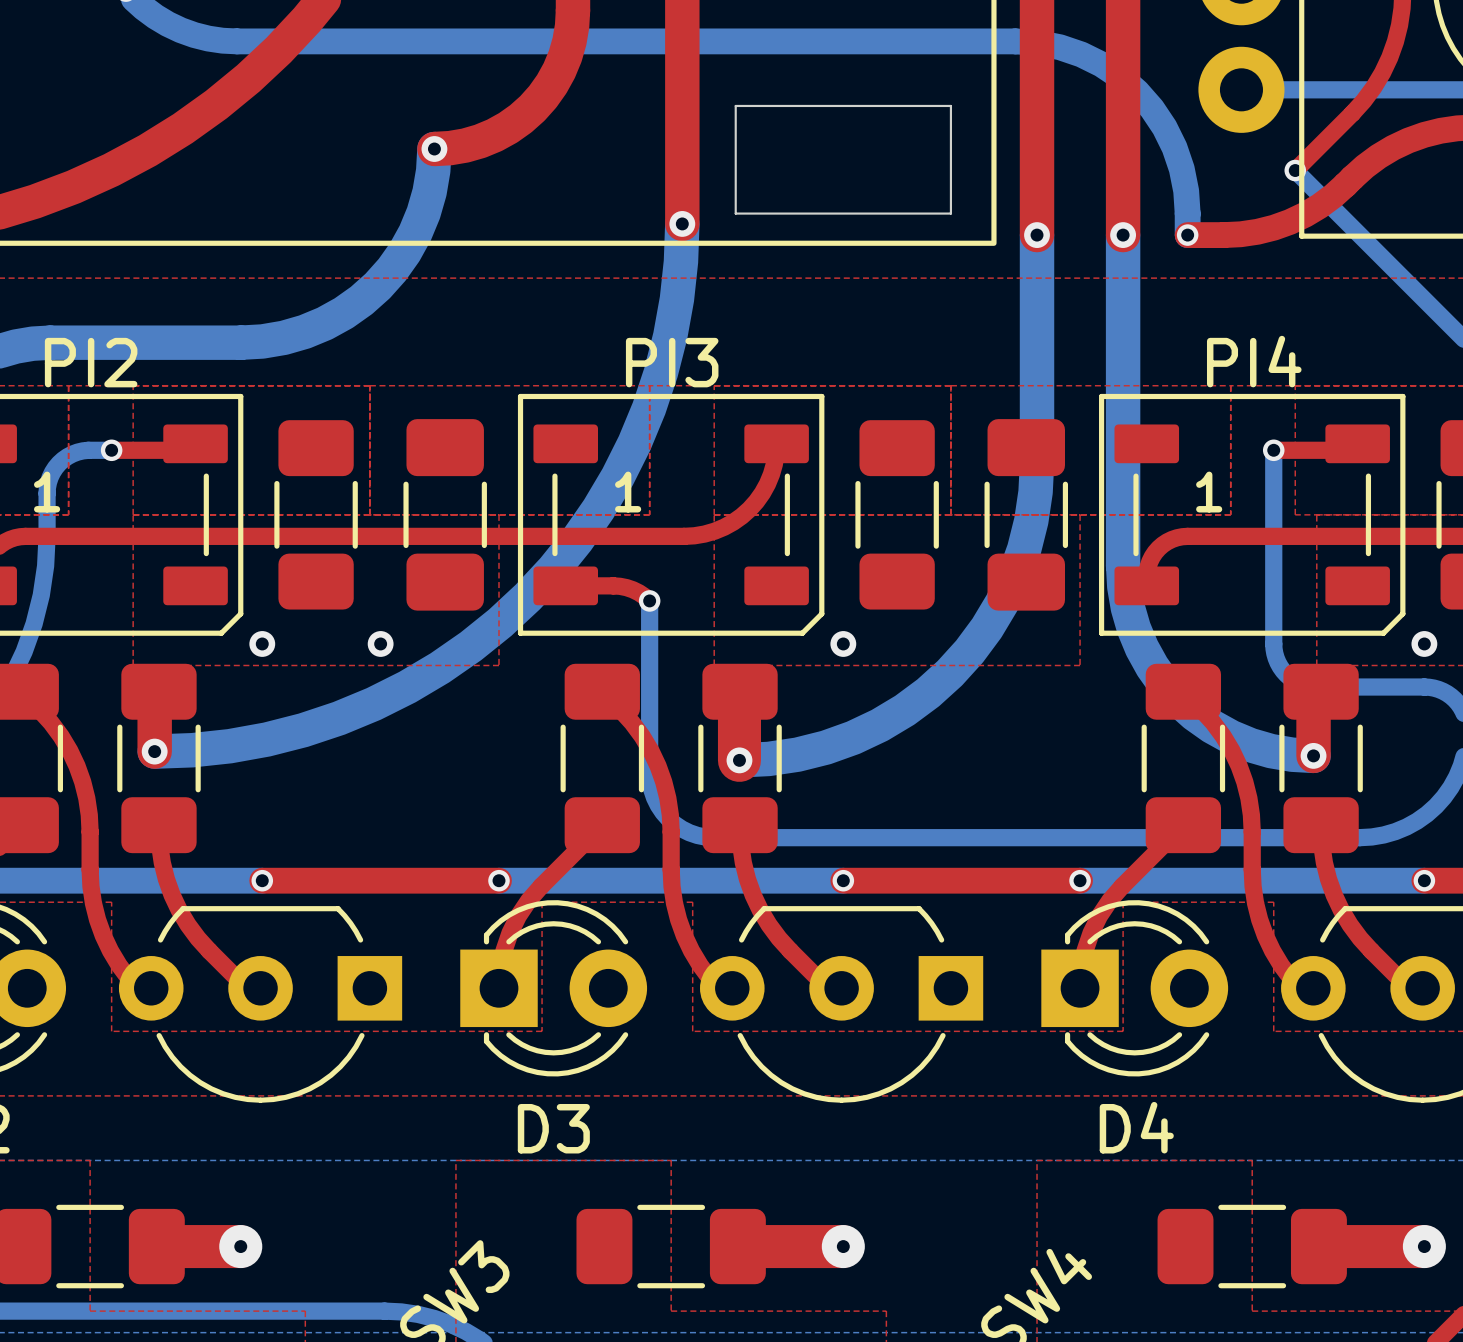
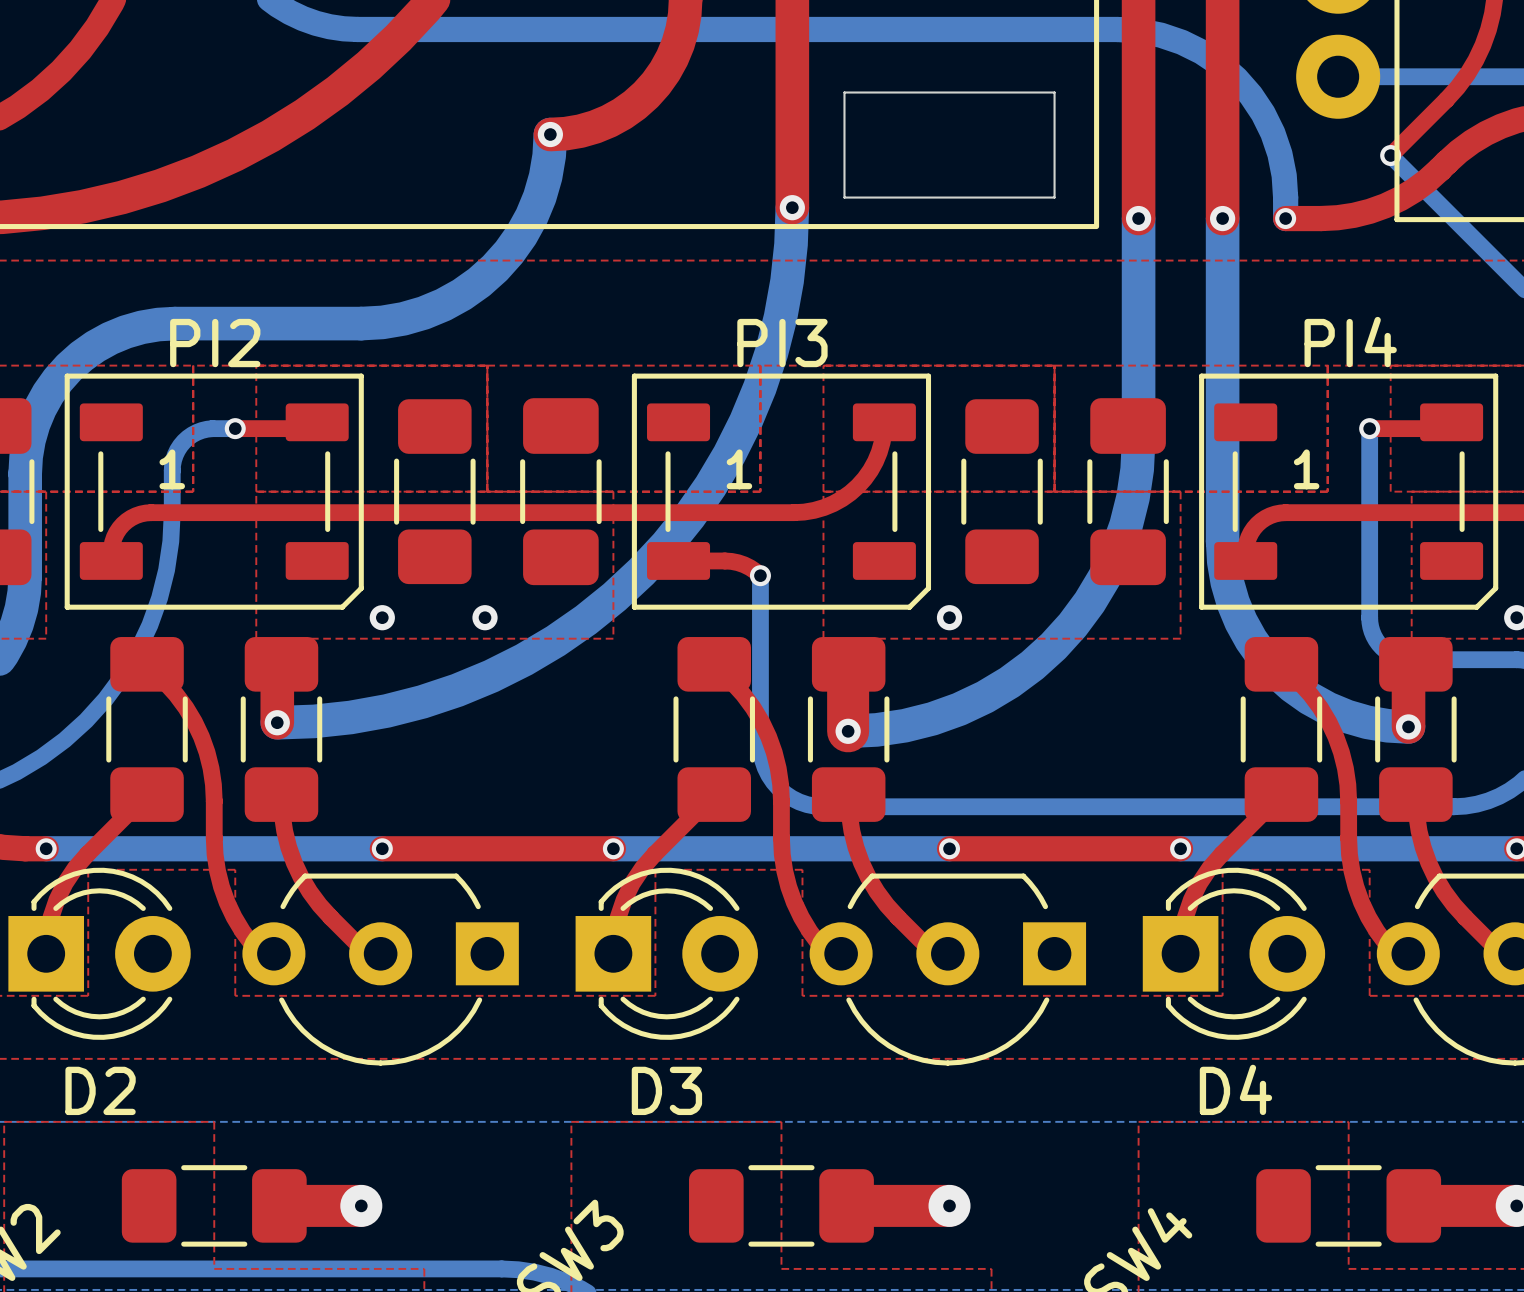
via position: (380, 643) -> (485, 617)

